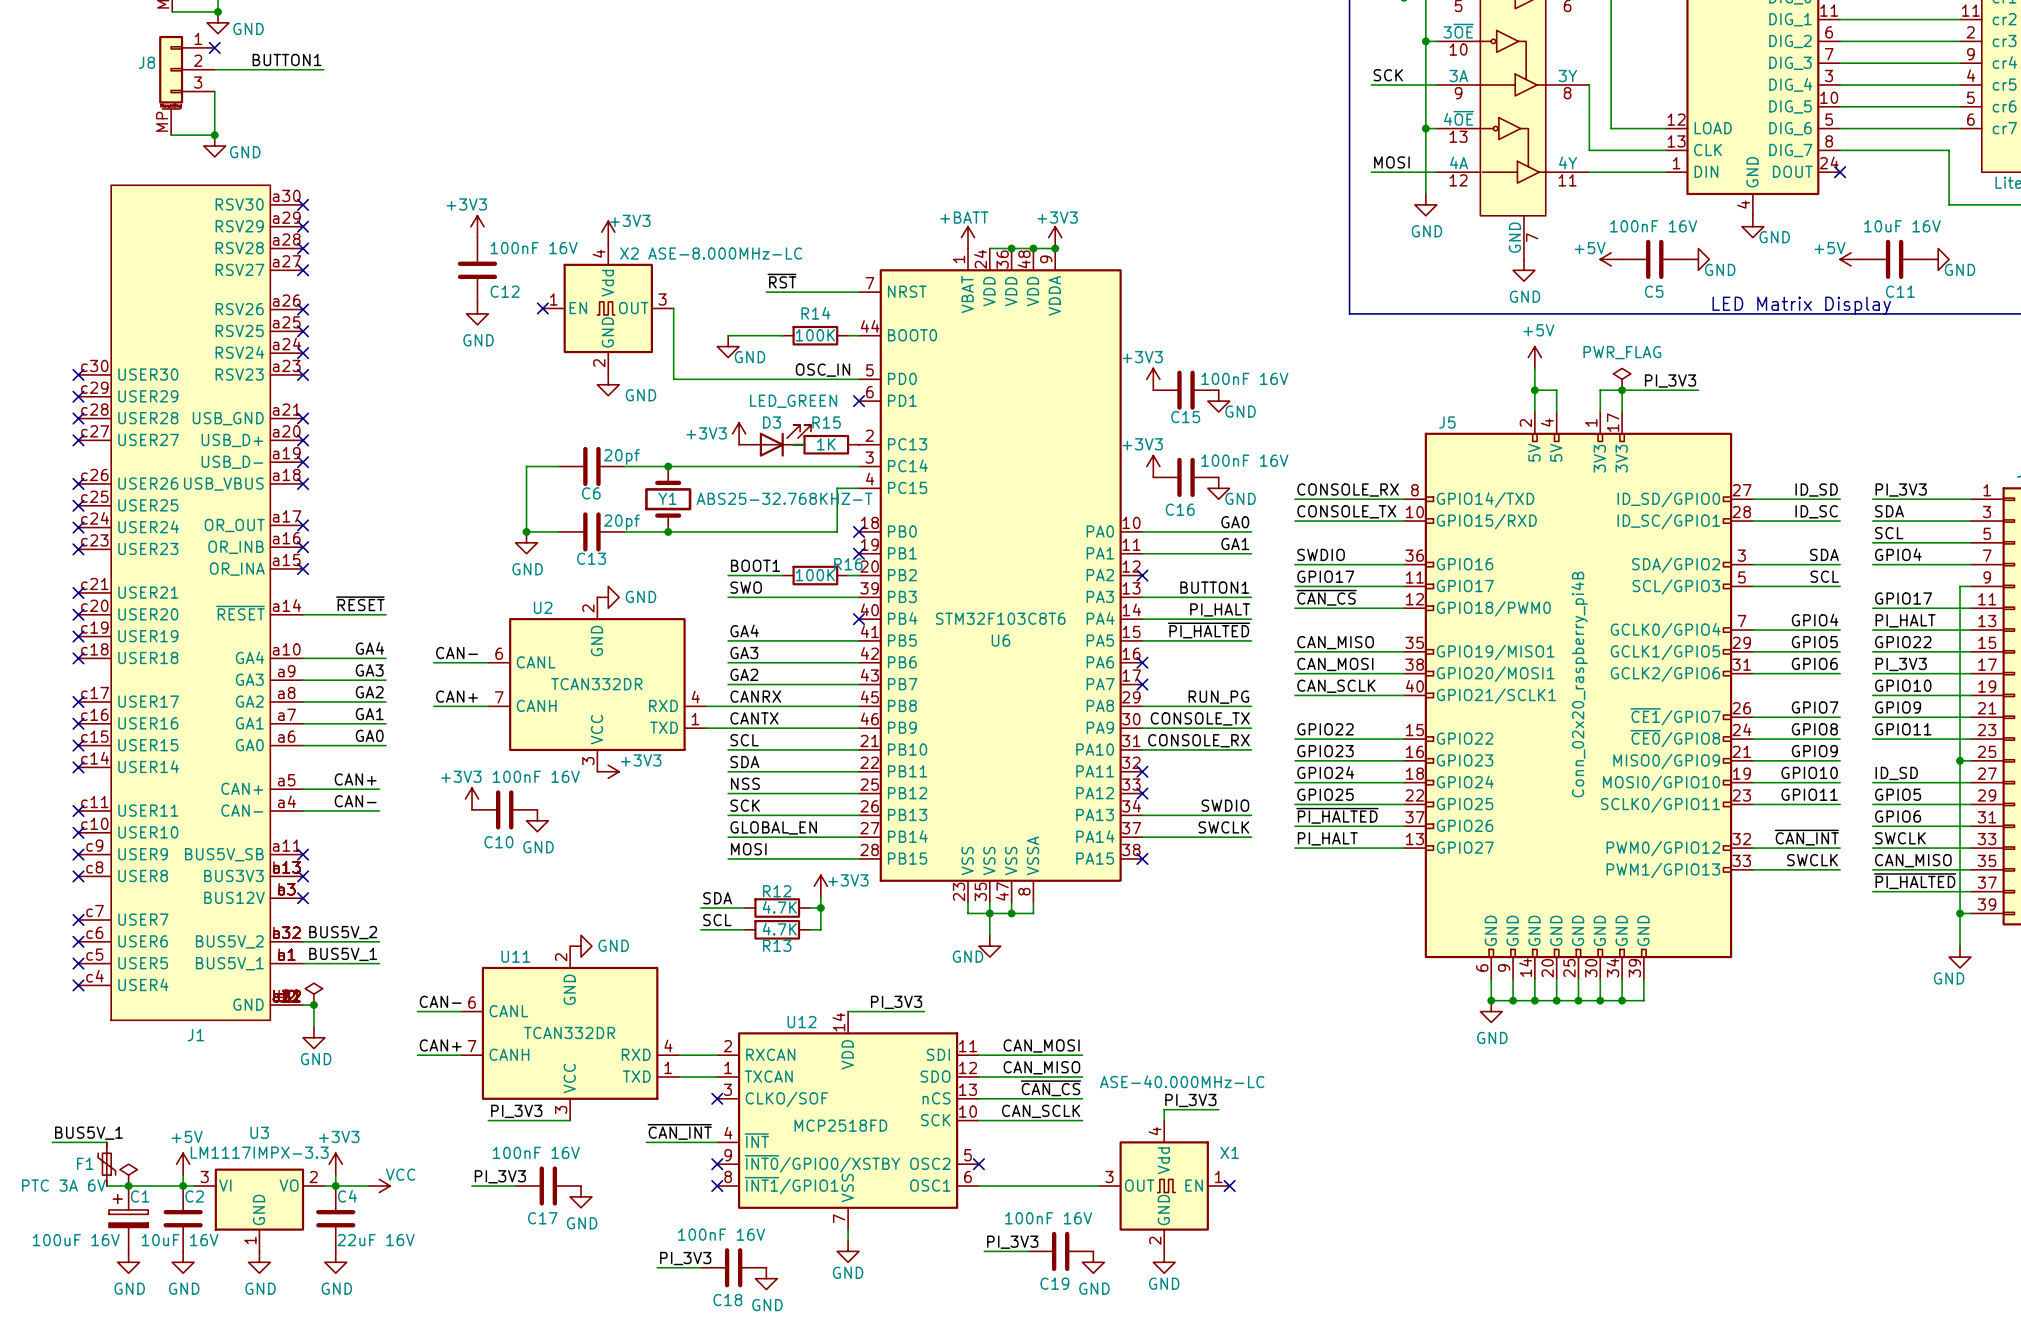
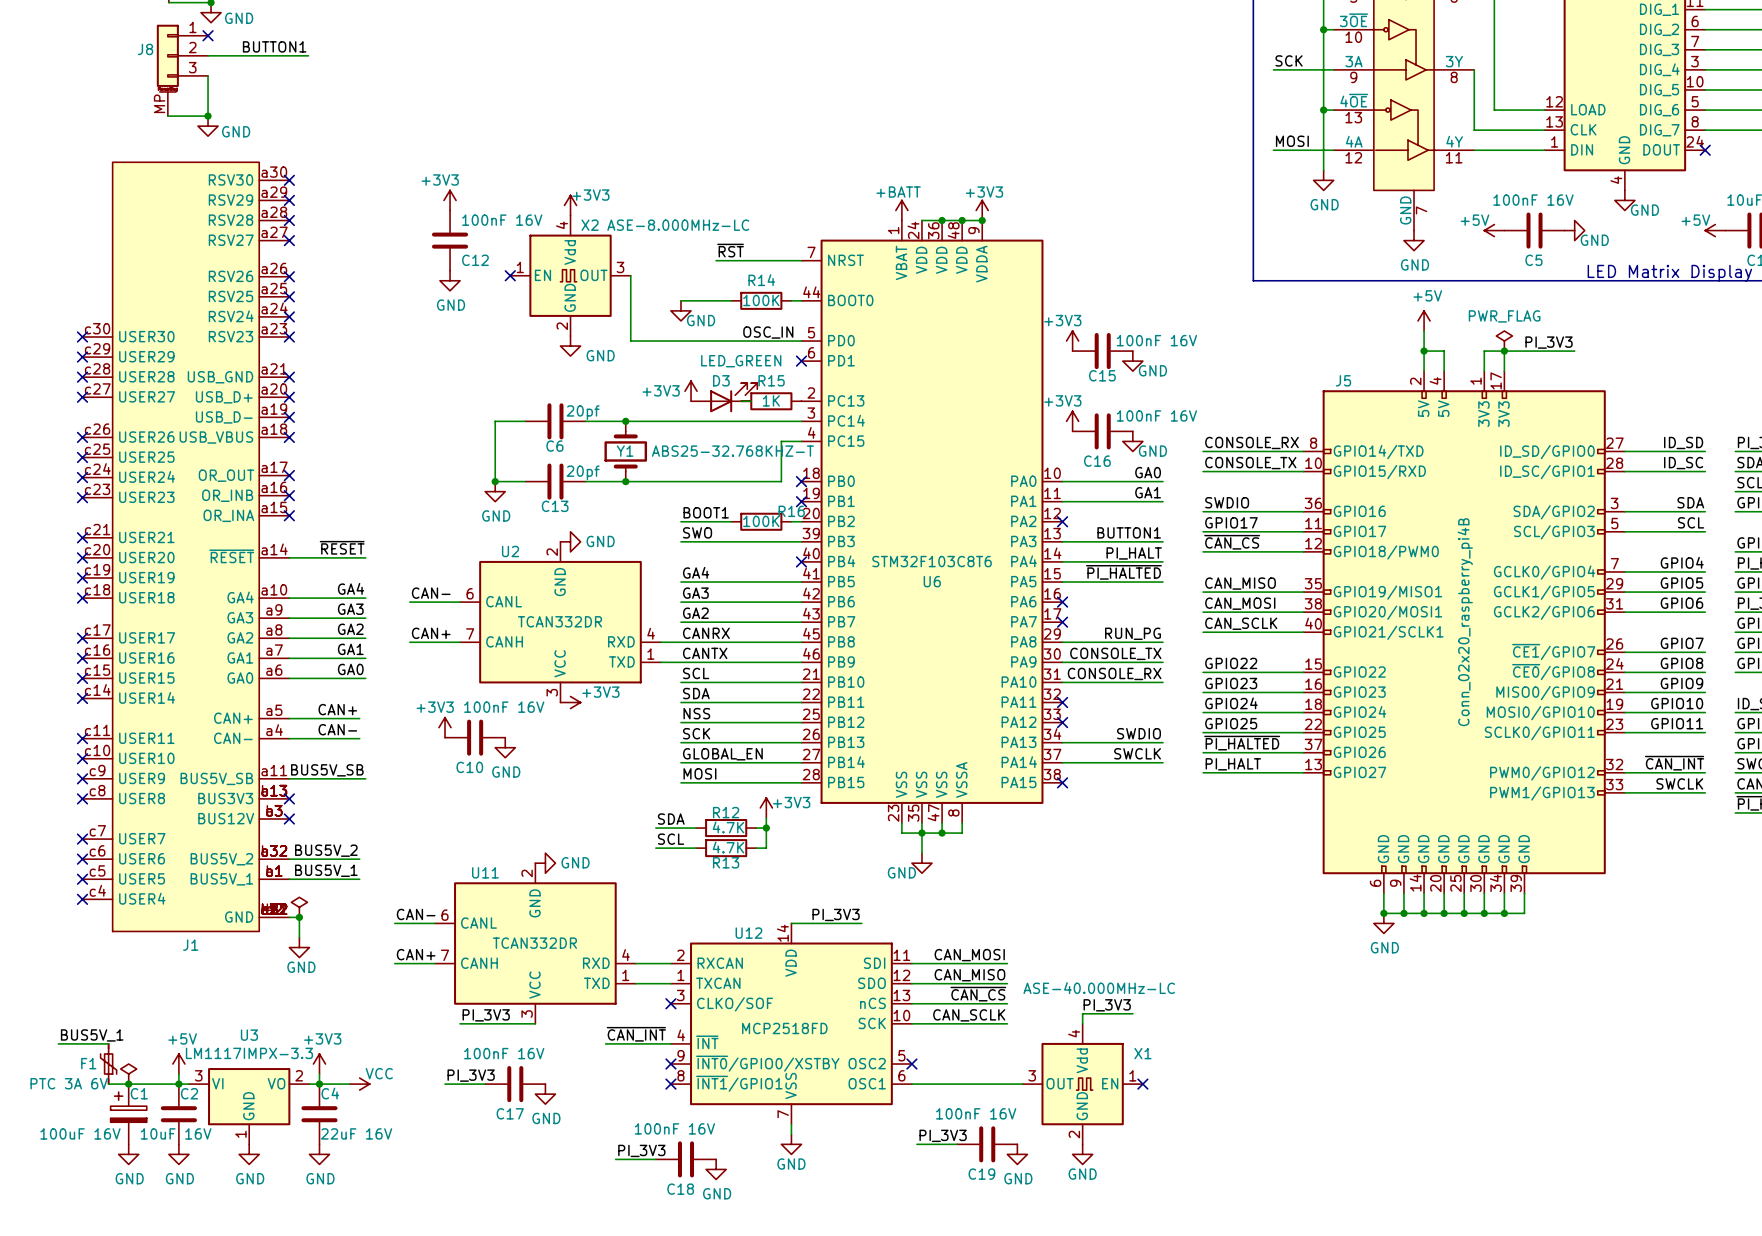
label: none -> BUS5V_SB (327, 770)
wire: none -> (289, 778) (365, 778)
no-connect mark: (303, 854) -> none

